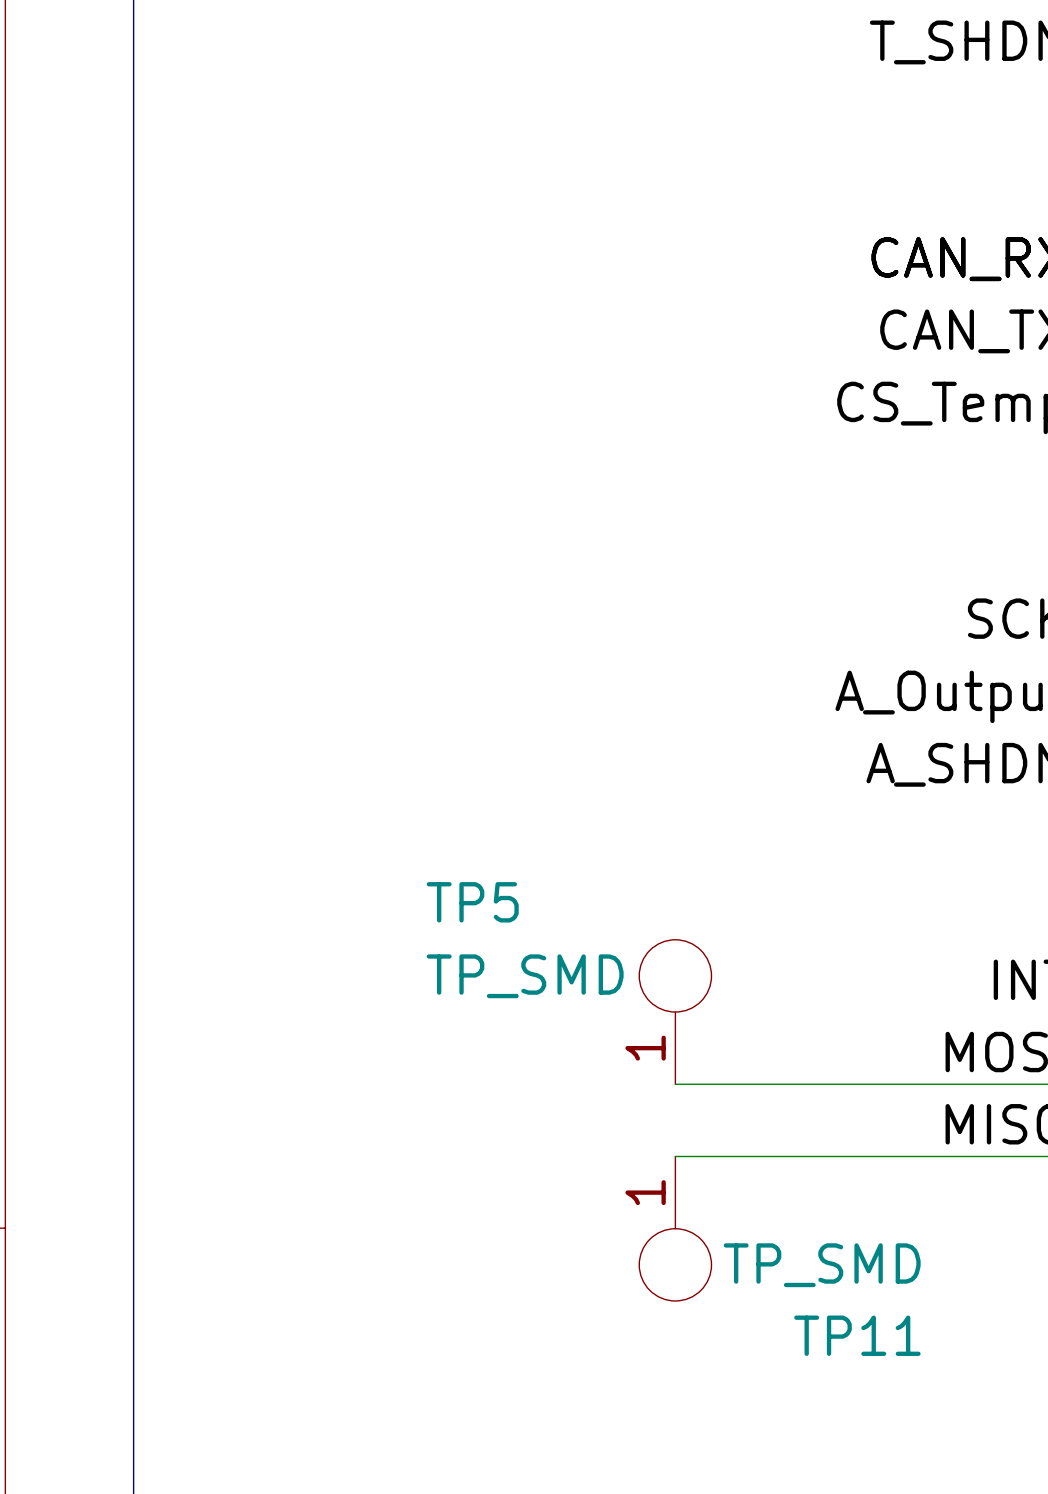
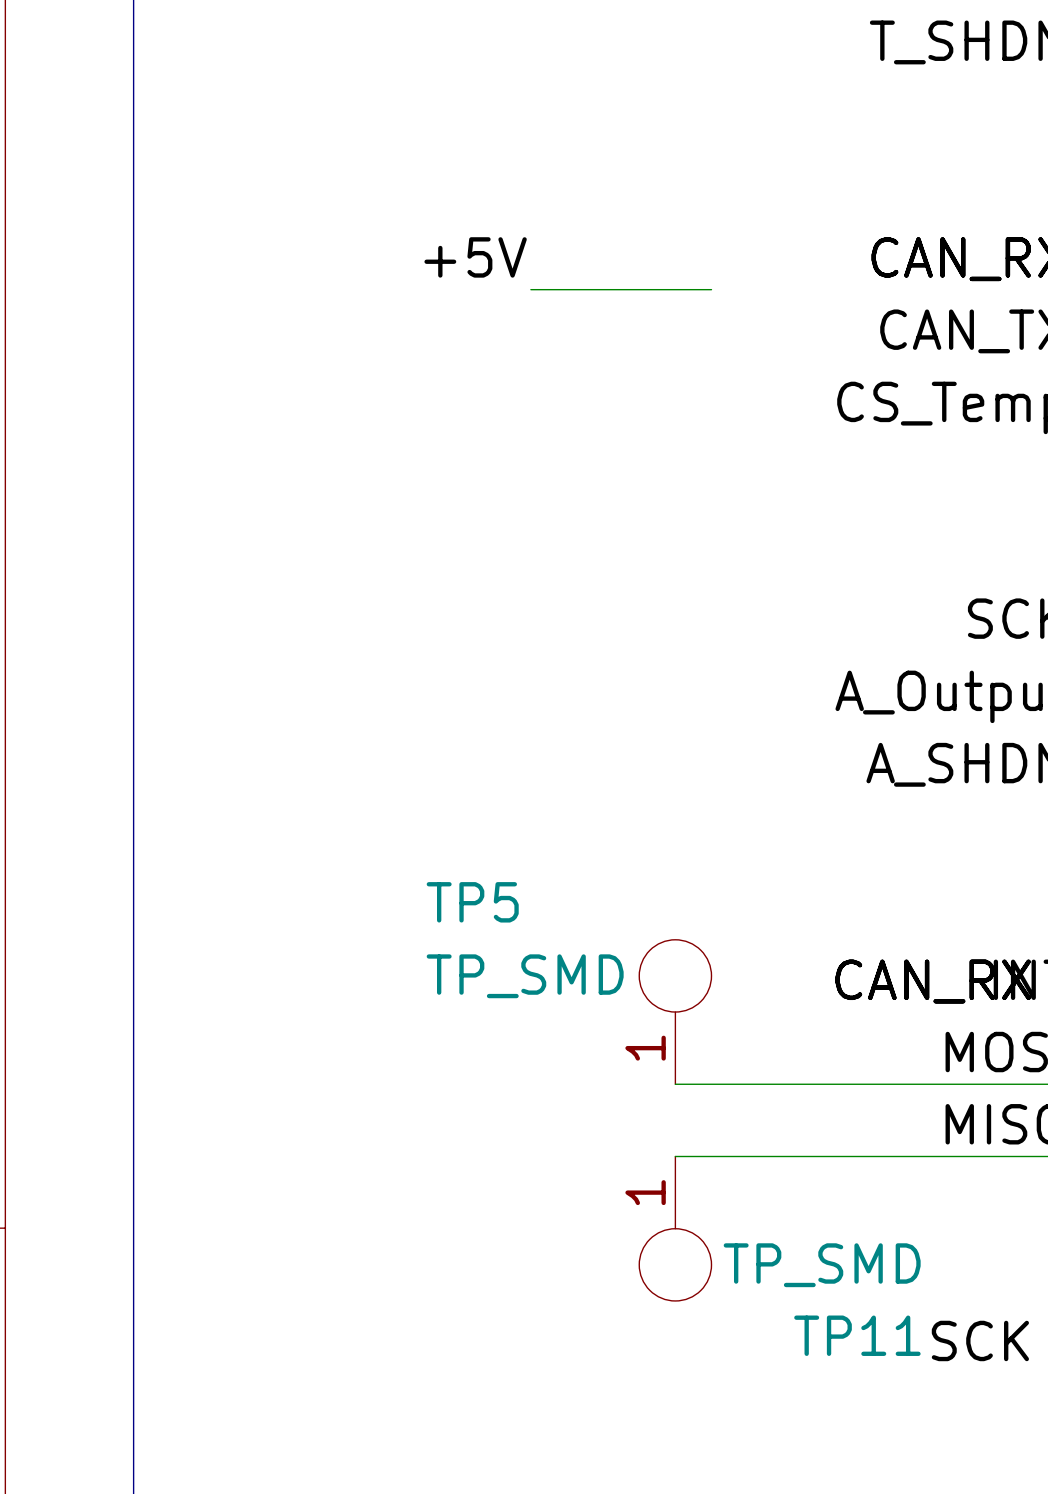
label: none -> +5V (475, 257)
wire: none -> (530, 289) (711, 289)
label: none -> CAN_RX (933, 981)
label: none -> SCK (980, 1340)

